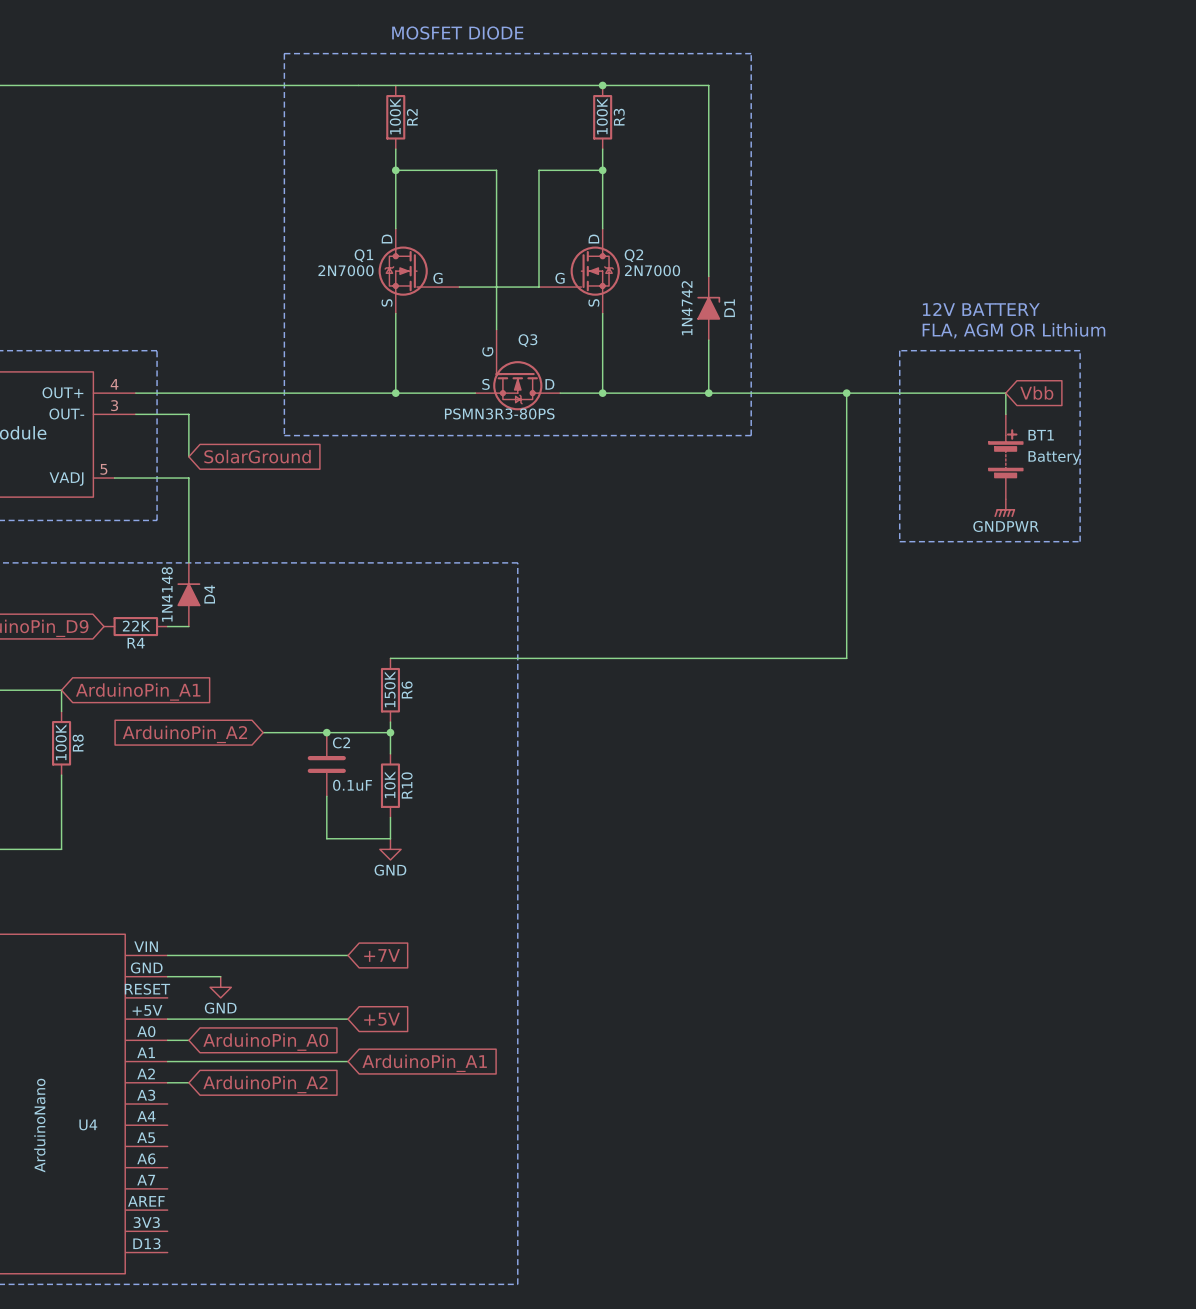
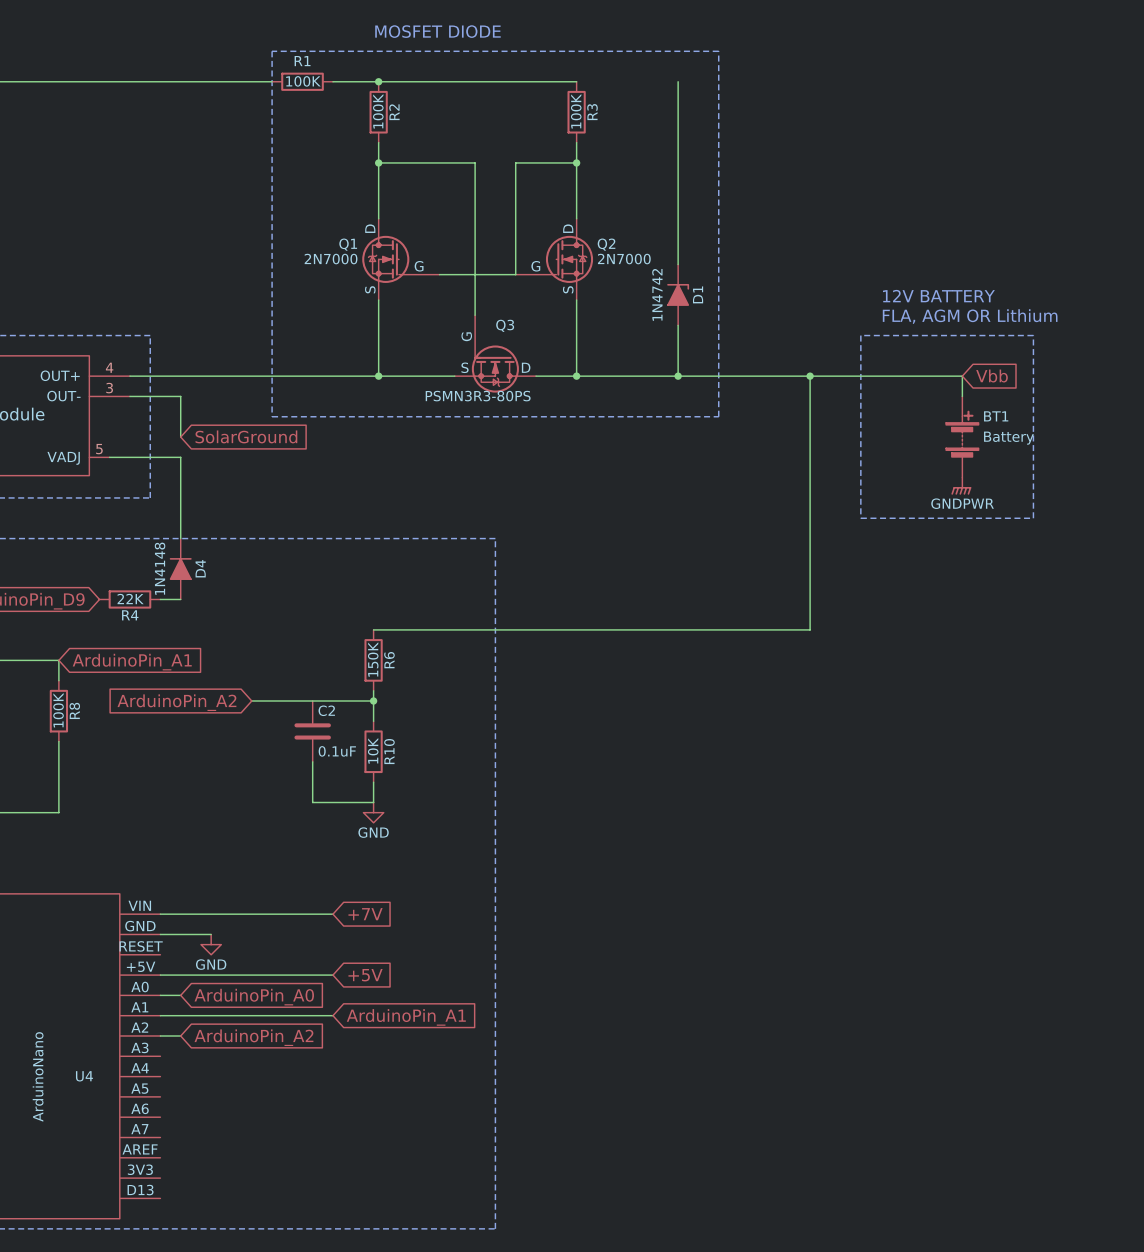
R1: none -> 100K (302, 81)
junction: none -> (378, 81)
wire: (602, 85) (708, 85) -> none
junction: (602, 85) -> none
junction: (326, 732) -> none

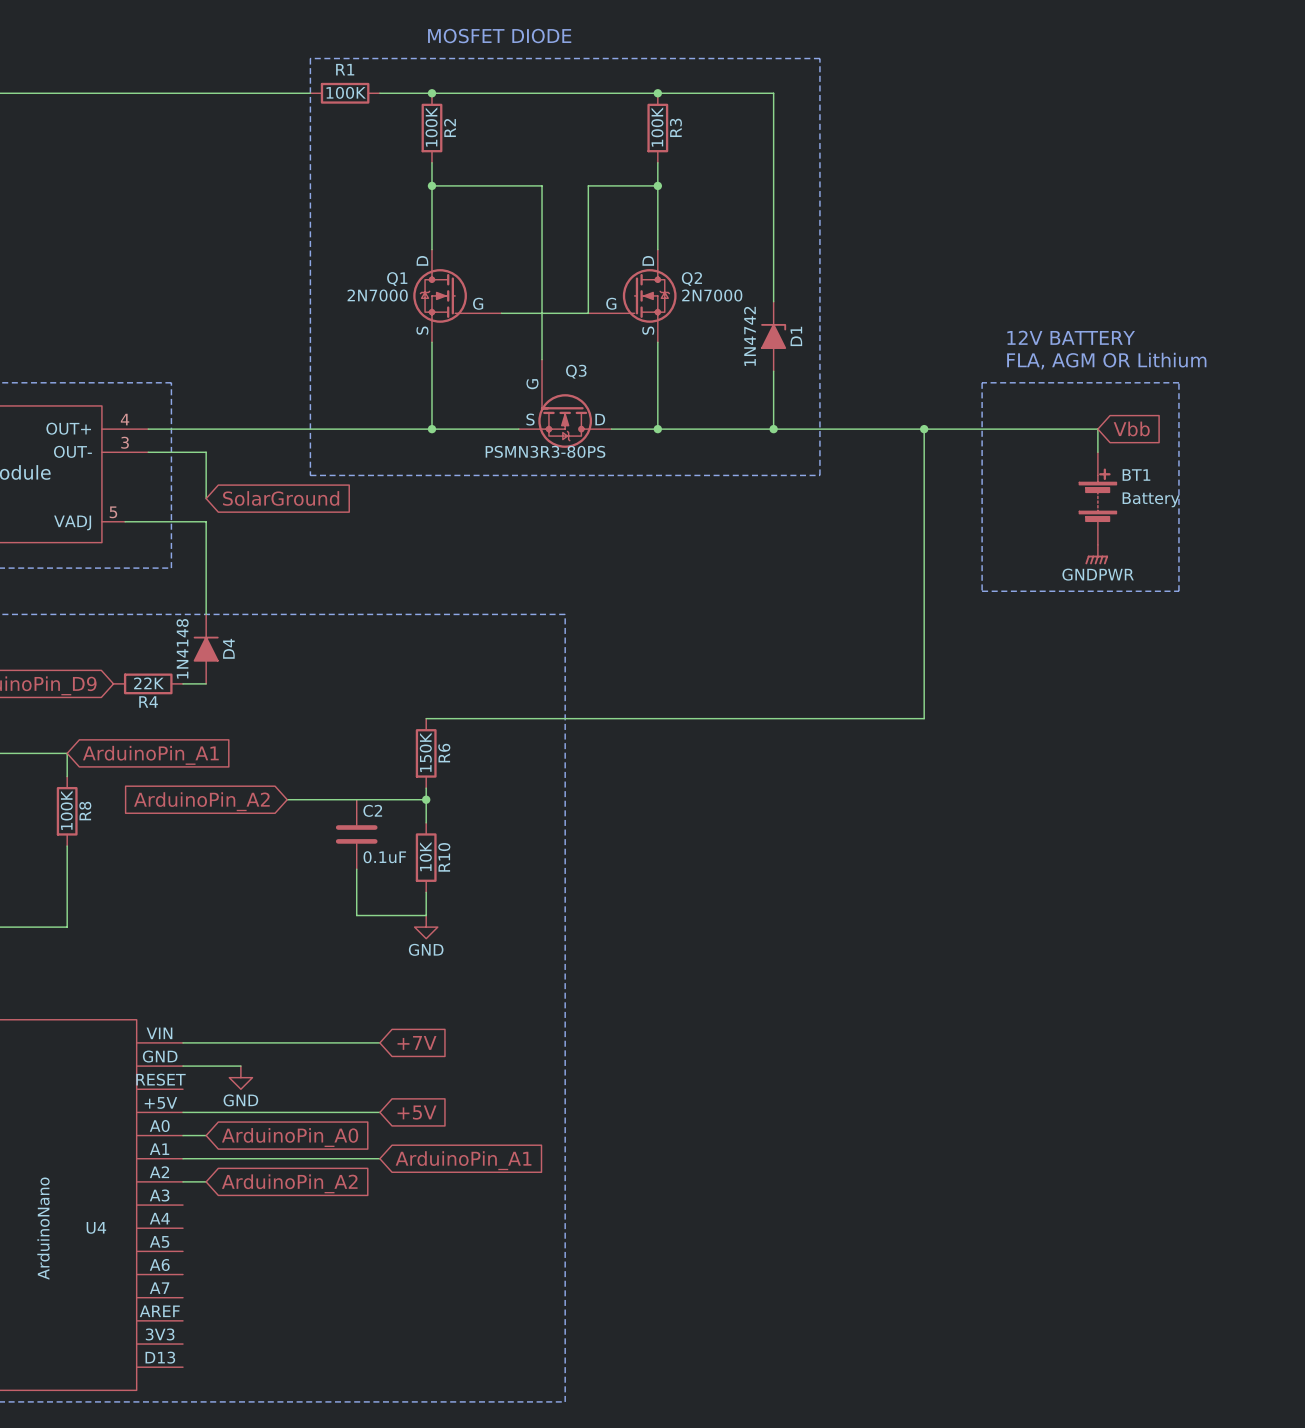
wire: none -> (657, 93) (773, 93)
junction: none -> (657, 93)

